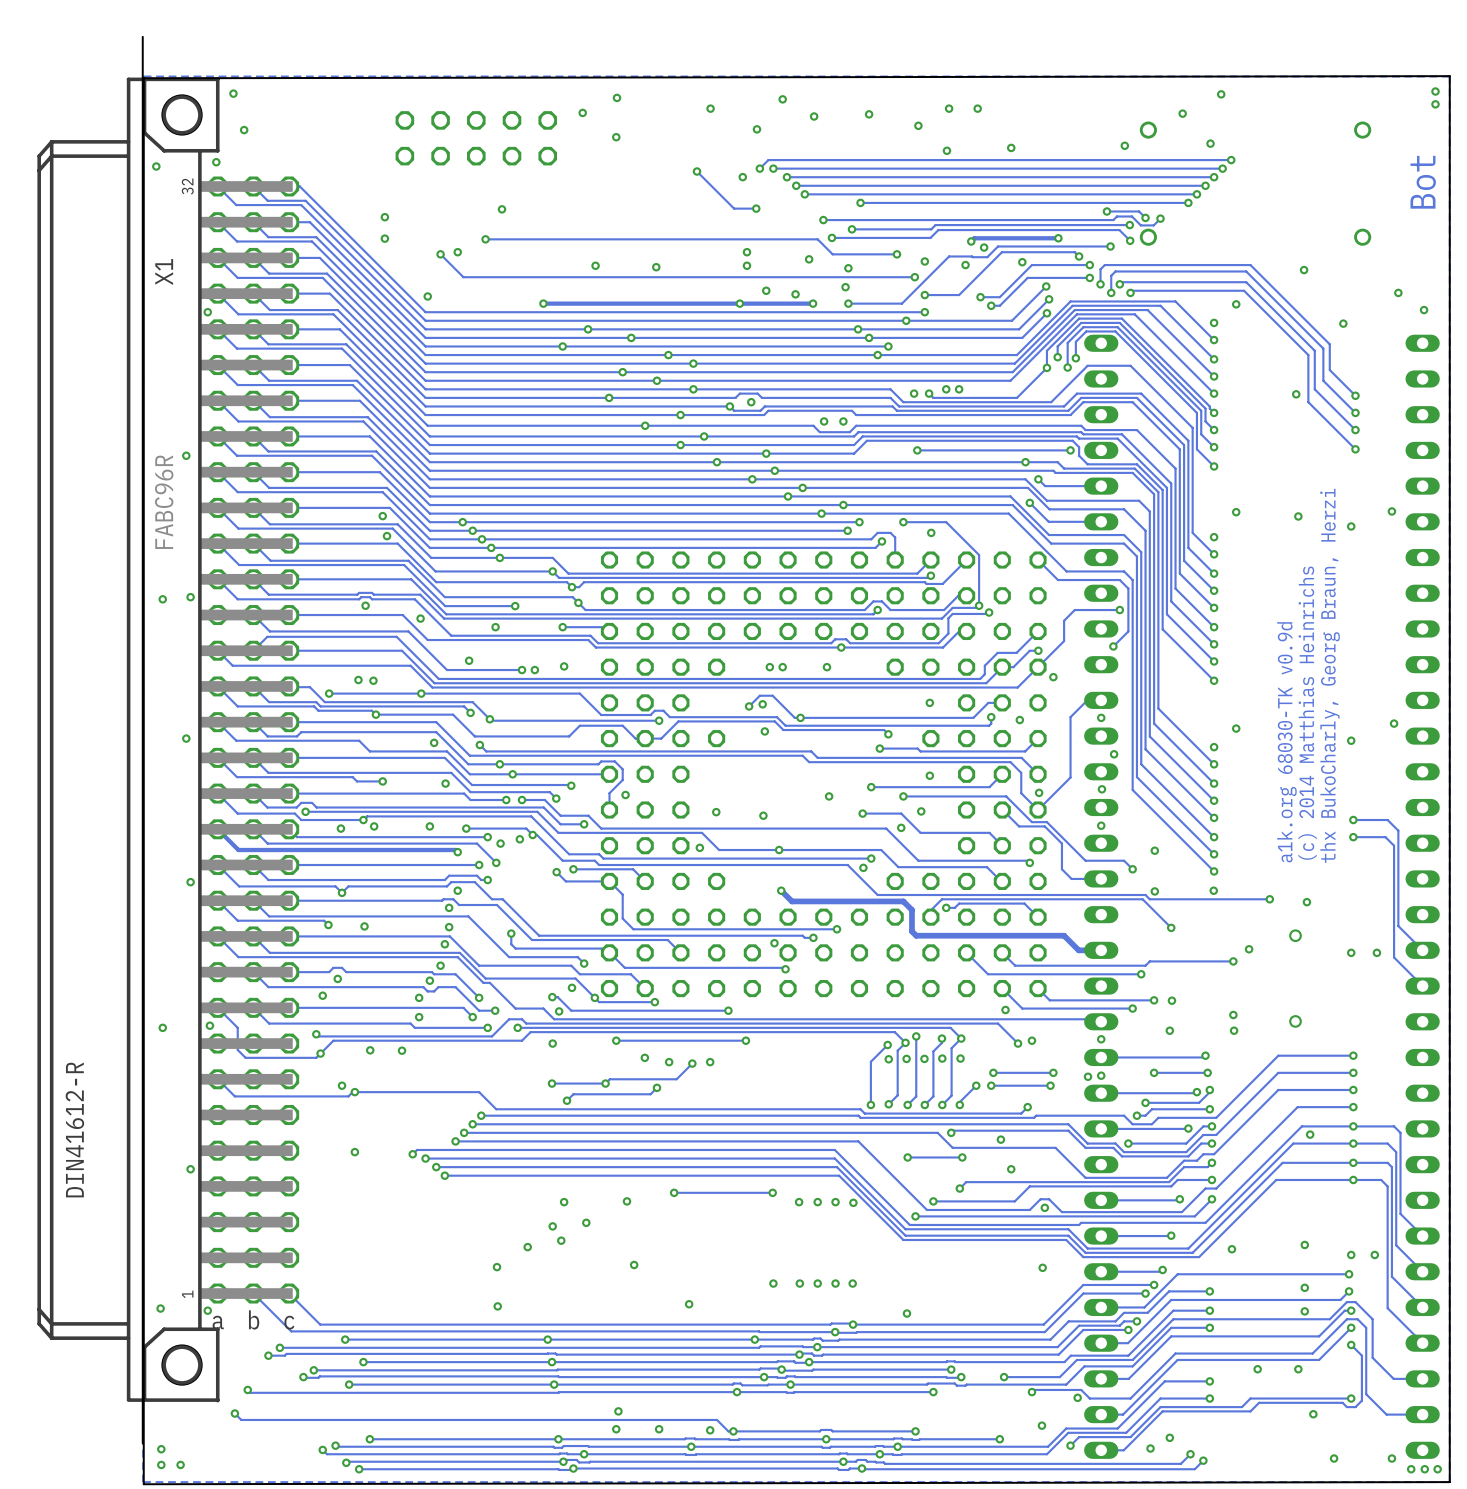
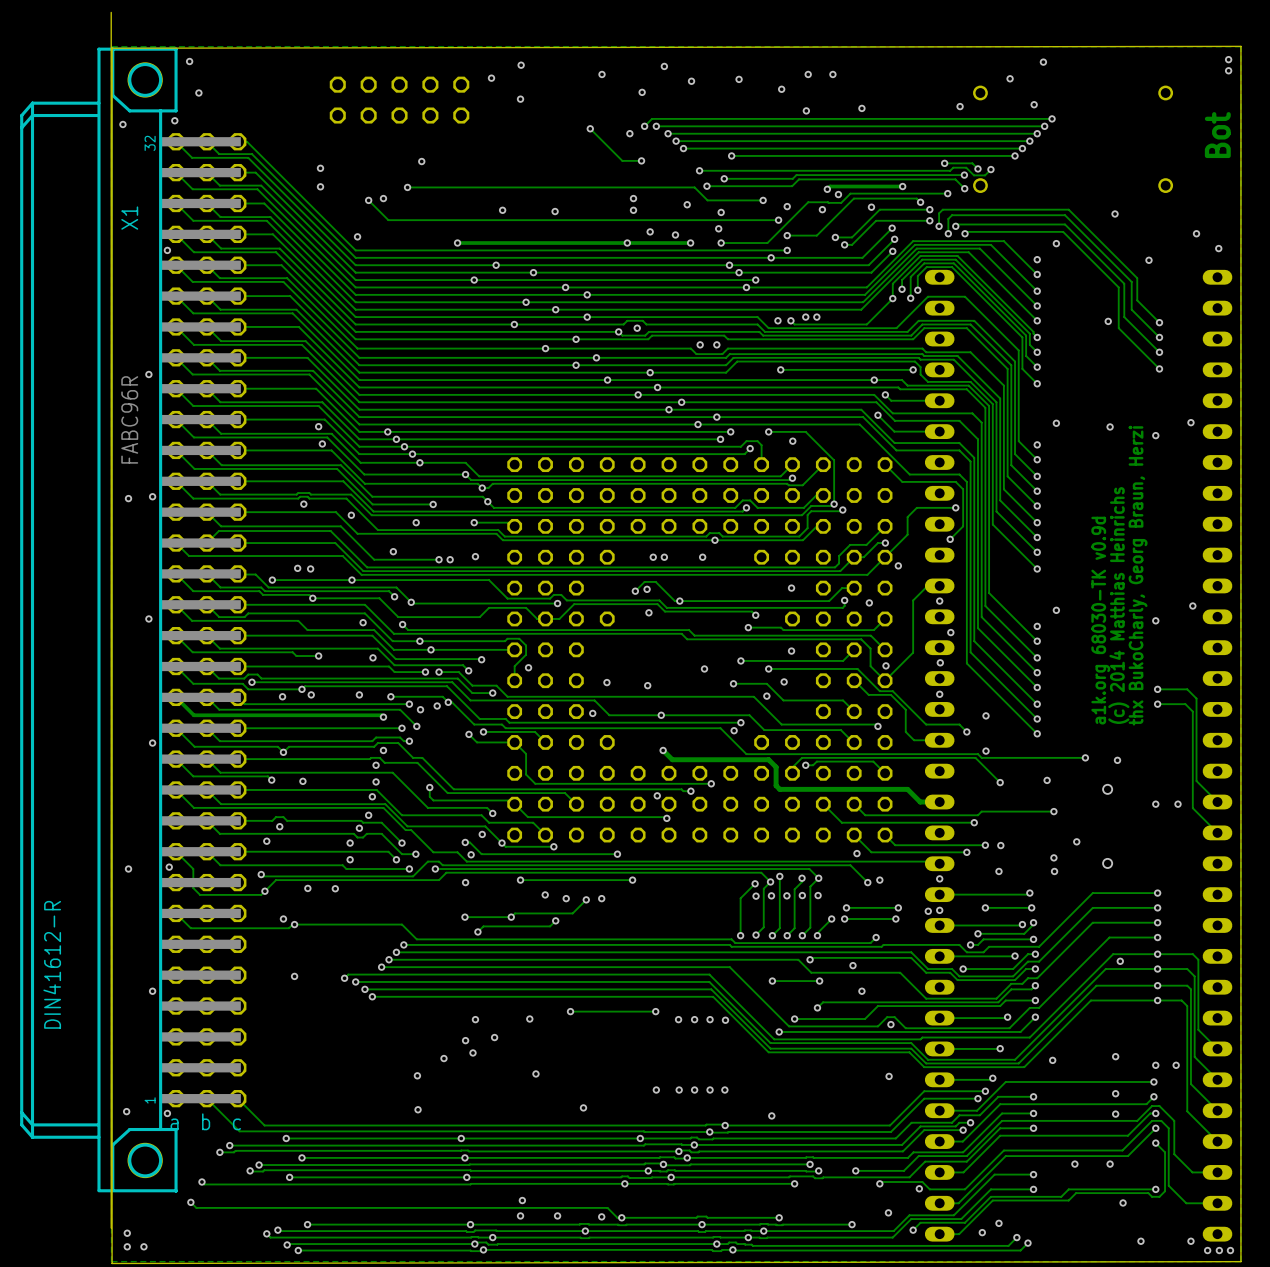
via: (1213, 890) -> none
via: none -> (1047, 780)
via: (1249, 949) -> none
via: none -> (1076, 841)

